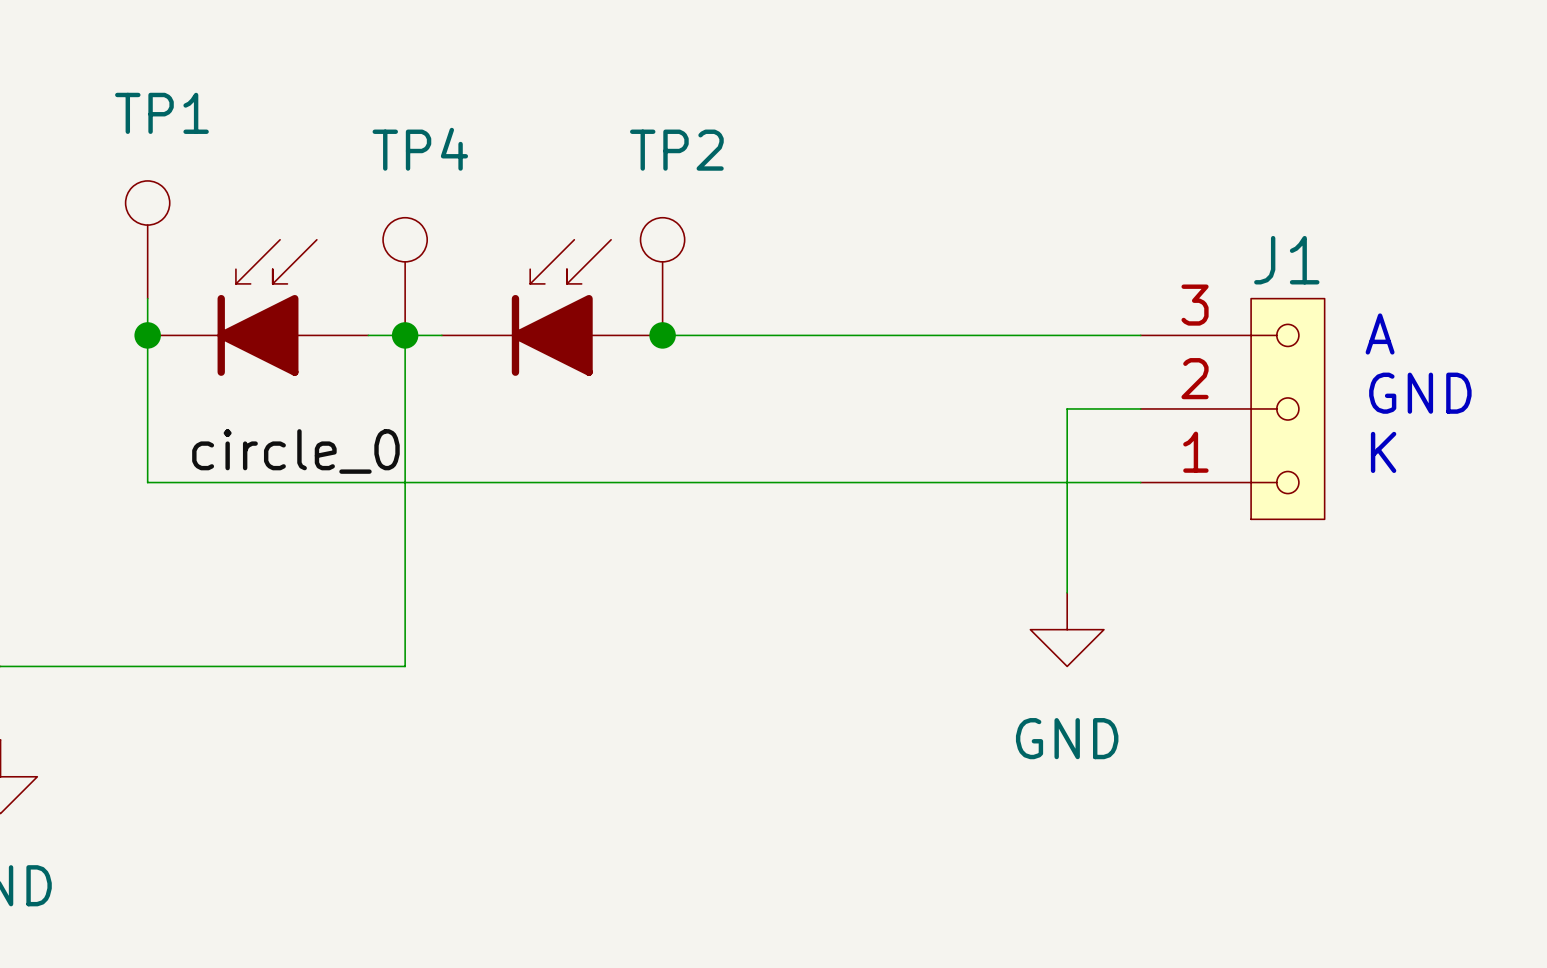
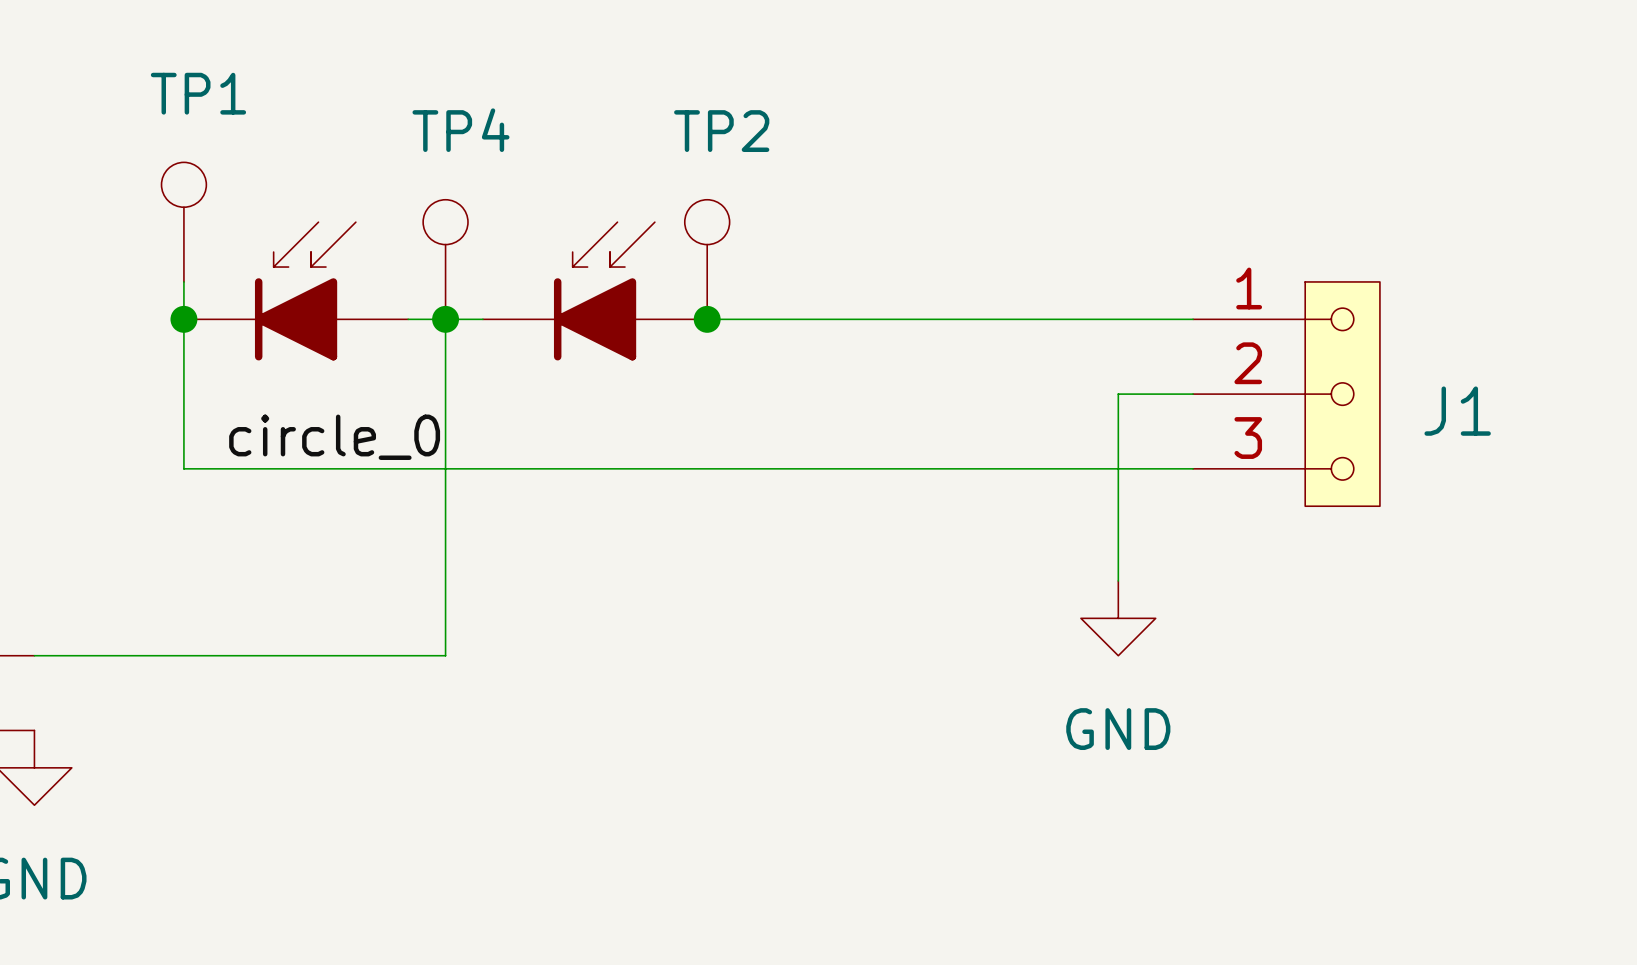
J1 name position: J1 (1286, 260) -> J1 (1457, 411)
text: A (1380, 333) -> none
text: GND (1420, 393) -> none
J1 flip: as is (1287, 408) -> up-down (1342, 394)
text: K (1383, 452) -> none

